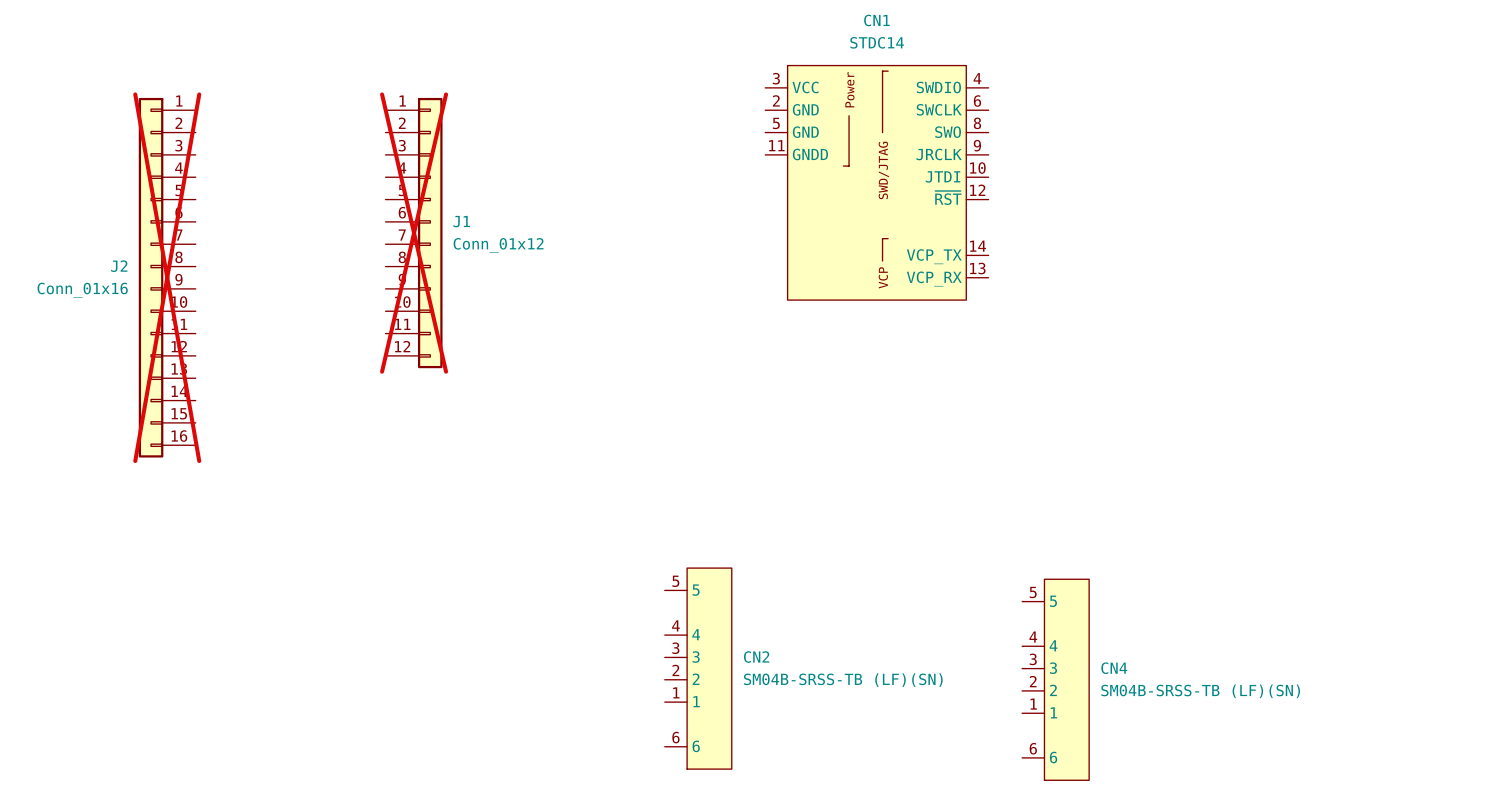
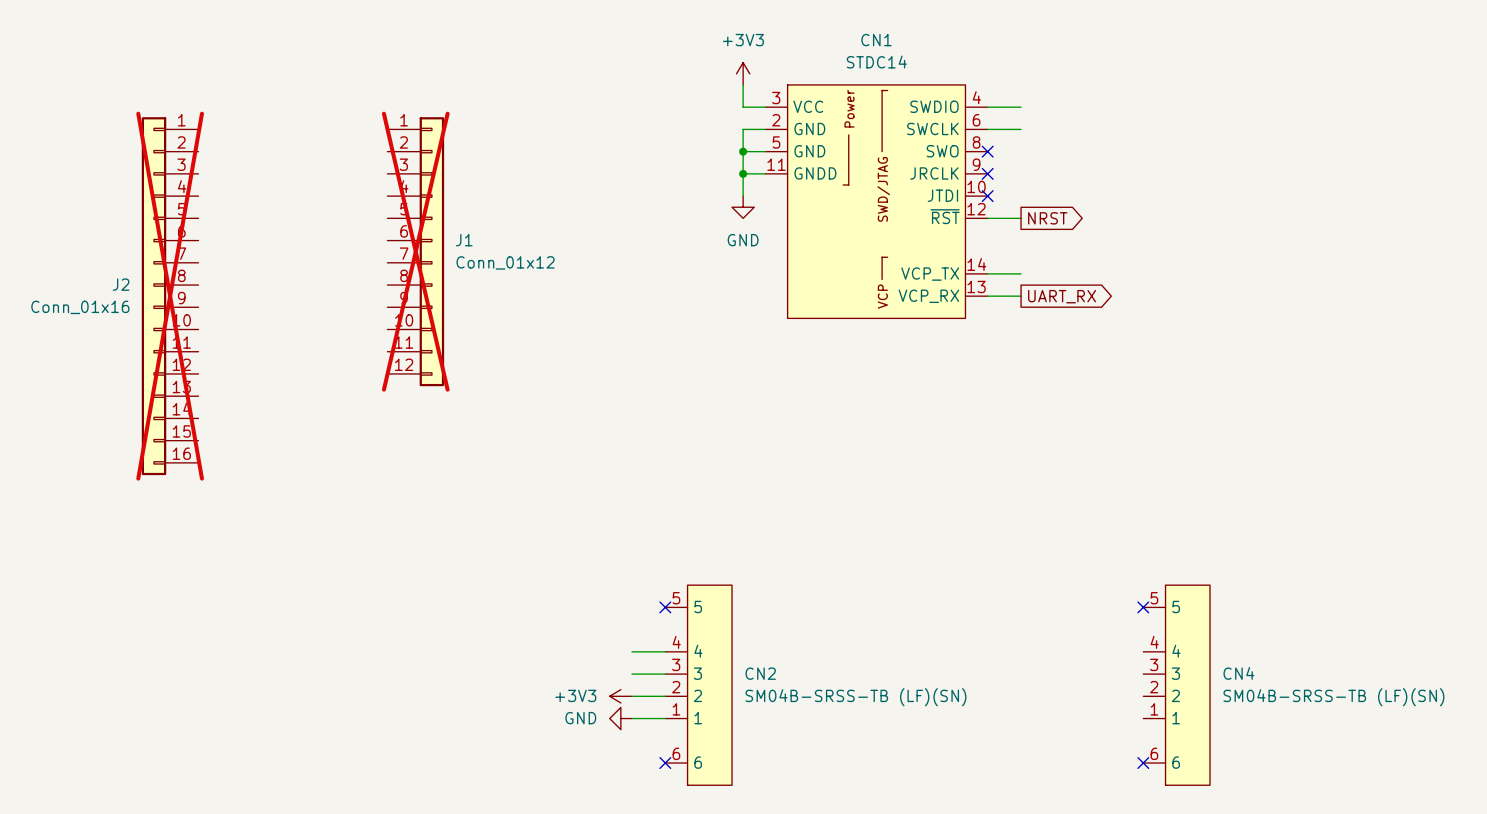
power symbol: none -> +3V3 (743, 73)
wire: none -> (743, 84) (743, 107) (765, 107)
wire: none -> (987, 107) (1021, 107)
wire: none -> (765, 129) (743, 129) (743, 196)
wire: none -> (987, 129) (1021, 129)
wire: none -> (743, 151) (765, 151)
junction: none -> (743, 151)
no-connect mark: none -> (987, 151)
wire: none -> (743, 173) (765, 173)
junction: none -> (743, 173)
no-connect mark: none -> (987, 173)
no-connect mark: none -> (987, 196)
power symbol: none -> GND (743, 207)
wire: none -> (987, 218) (1021, 218)
global label: none -> NRST (1047, 218)
wire: none -> (987, 273) (1021, 273)
wire: none -> (987, 296) (1021, 296)
global label: none -> UART_RX (1062, 296)
no-connect mark: none -> (665, 607)
no-connect mark: none -> (1143, 607)
wire: none -> (631, 651) (665, 651)
wire: none -> (631, 674) (665, 674)
power symbol: none -> +3V3 (620, 696)
wire: none -> (631, 696) (665, 696)
CN4 position: (1055, 679) -> (1176, 685)
power symbol: none -> GND (620, 718)
wire: none -> (631, 718) (665, 718)
no-connect mark: none -> (665, 763)
no-connect mark: none -> (1143, 763)

